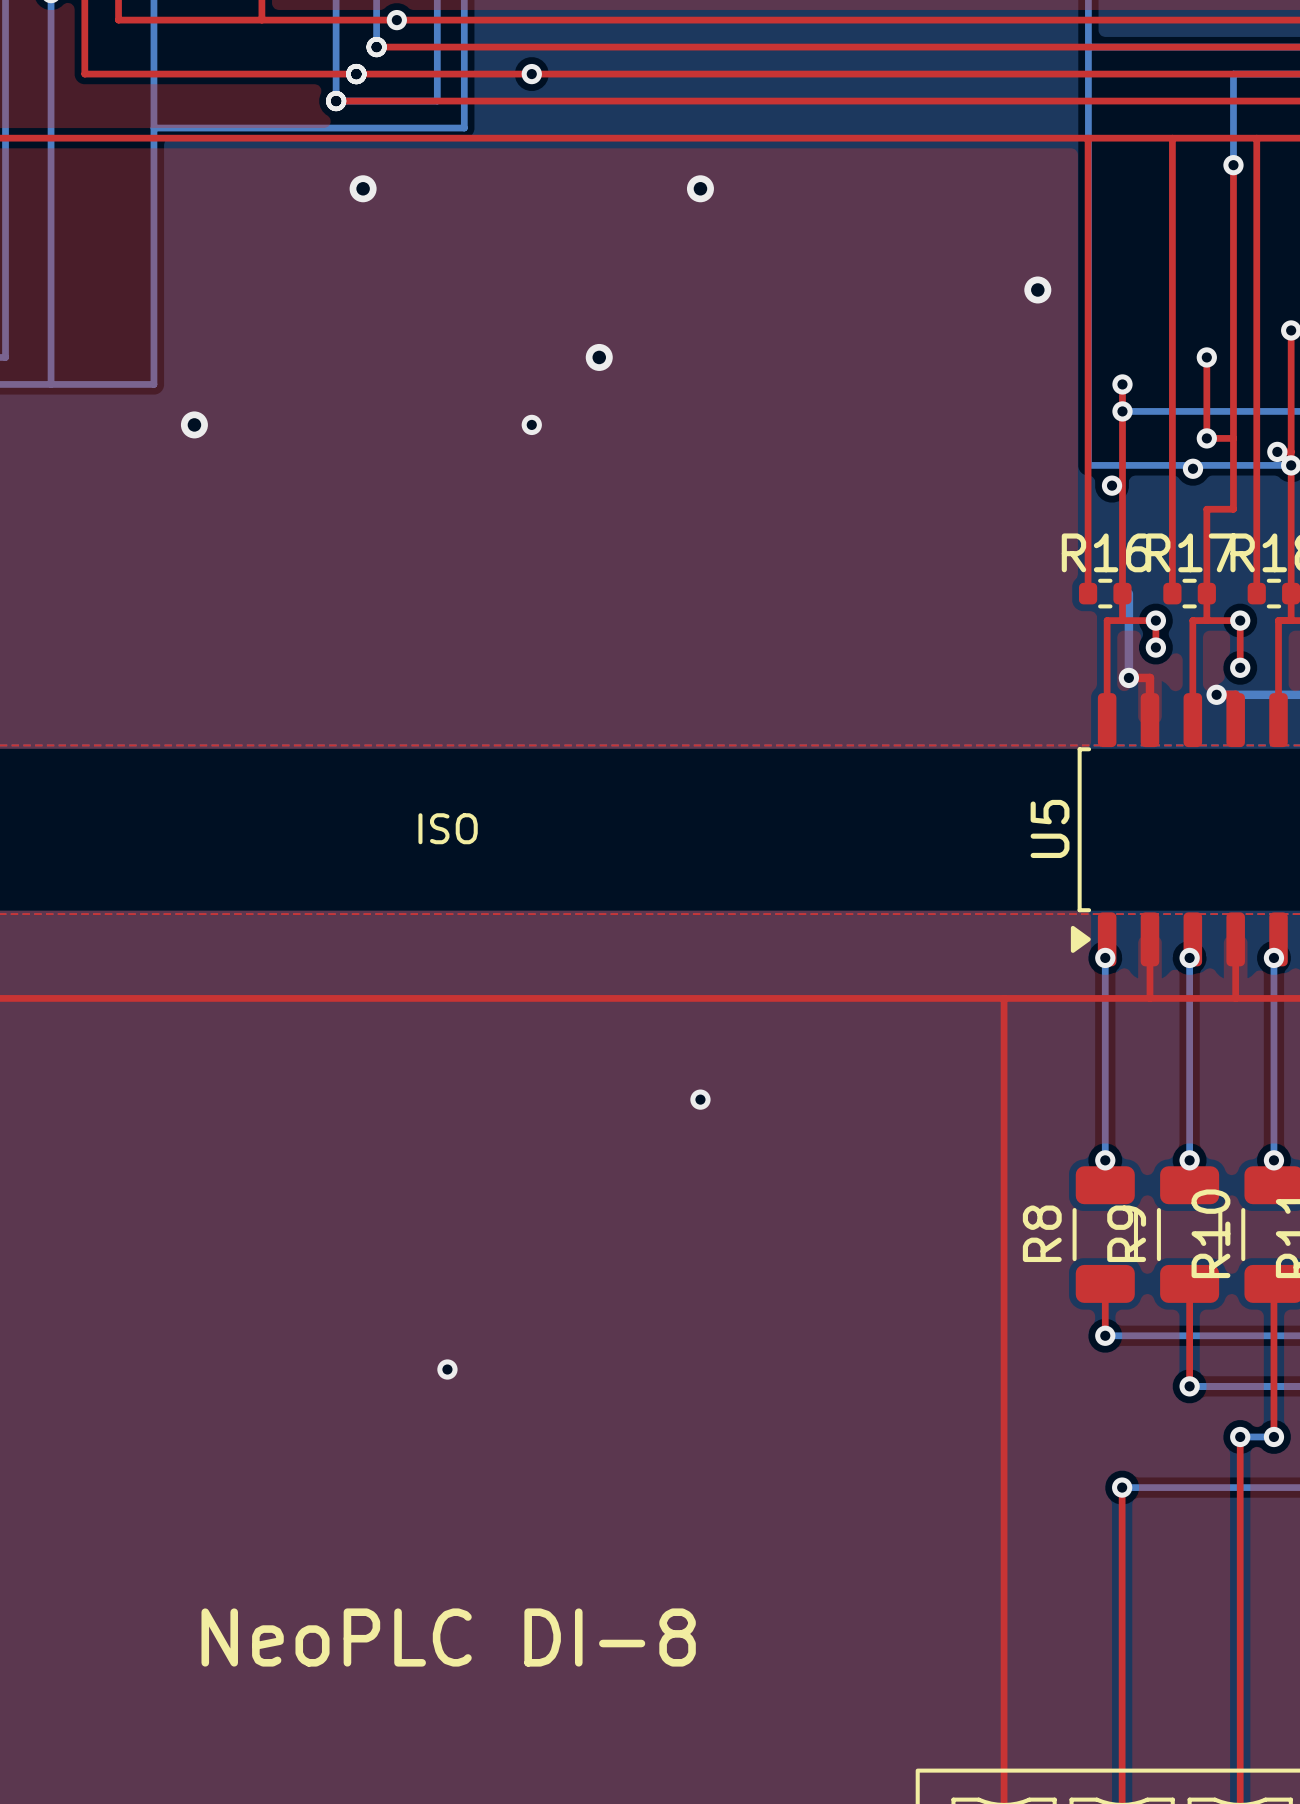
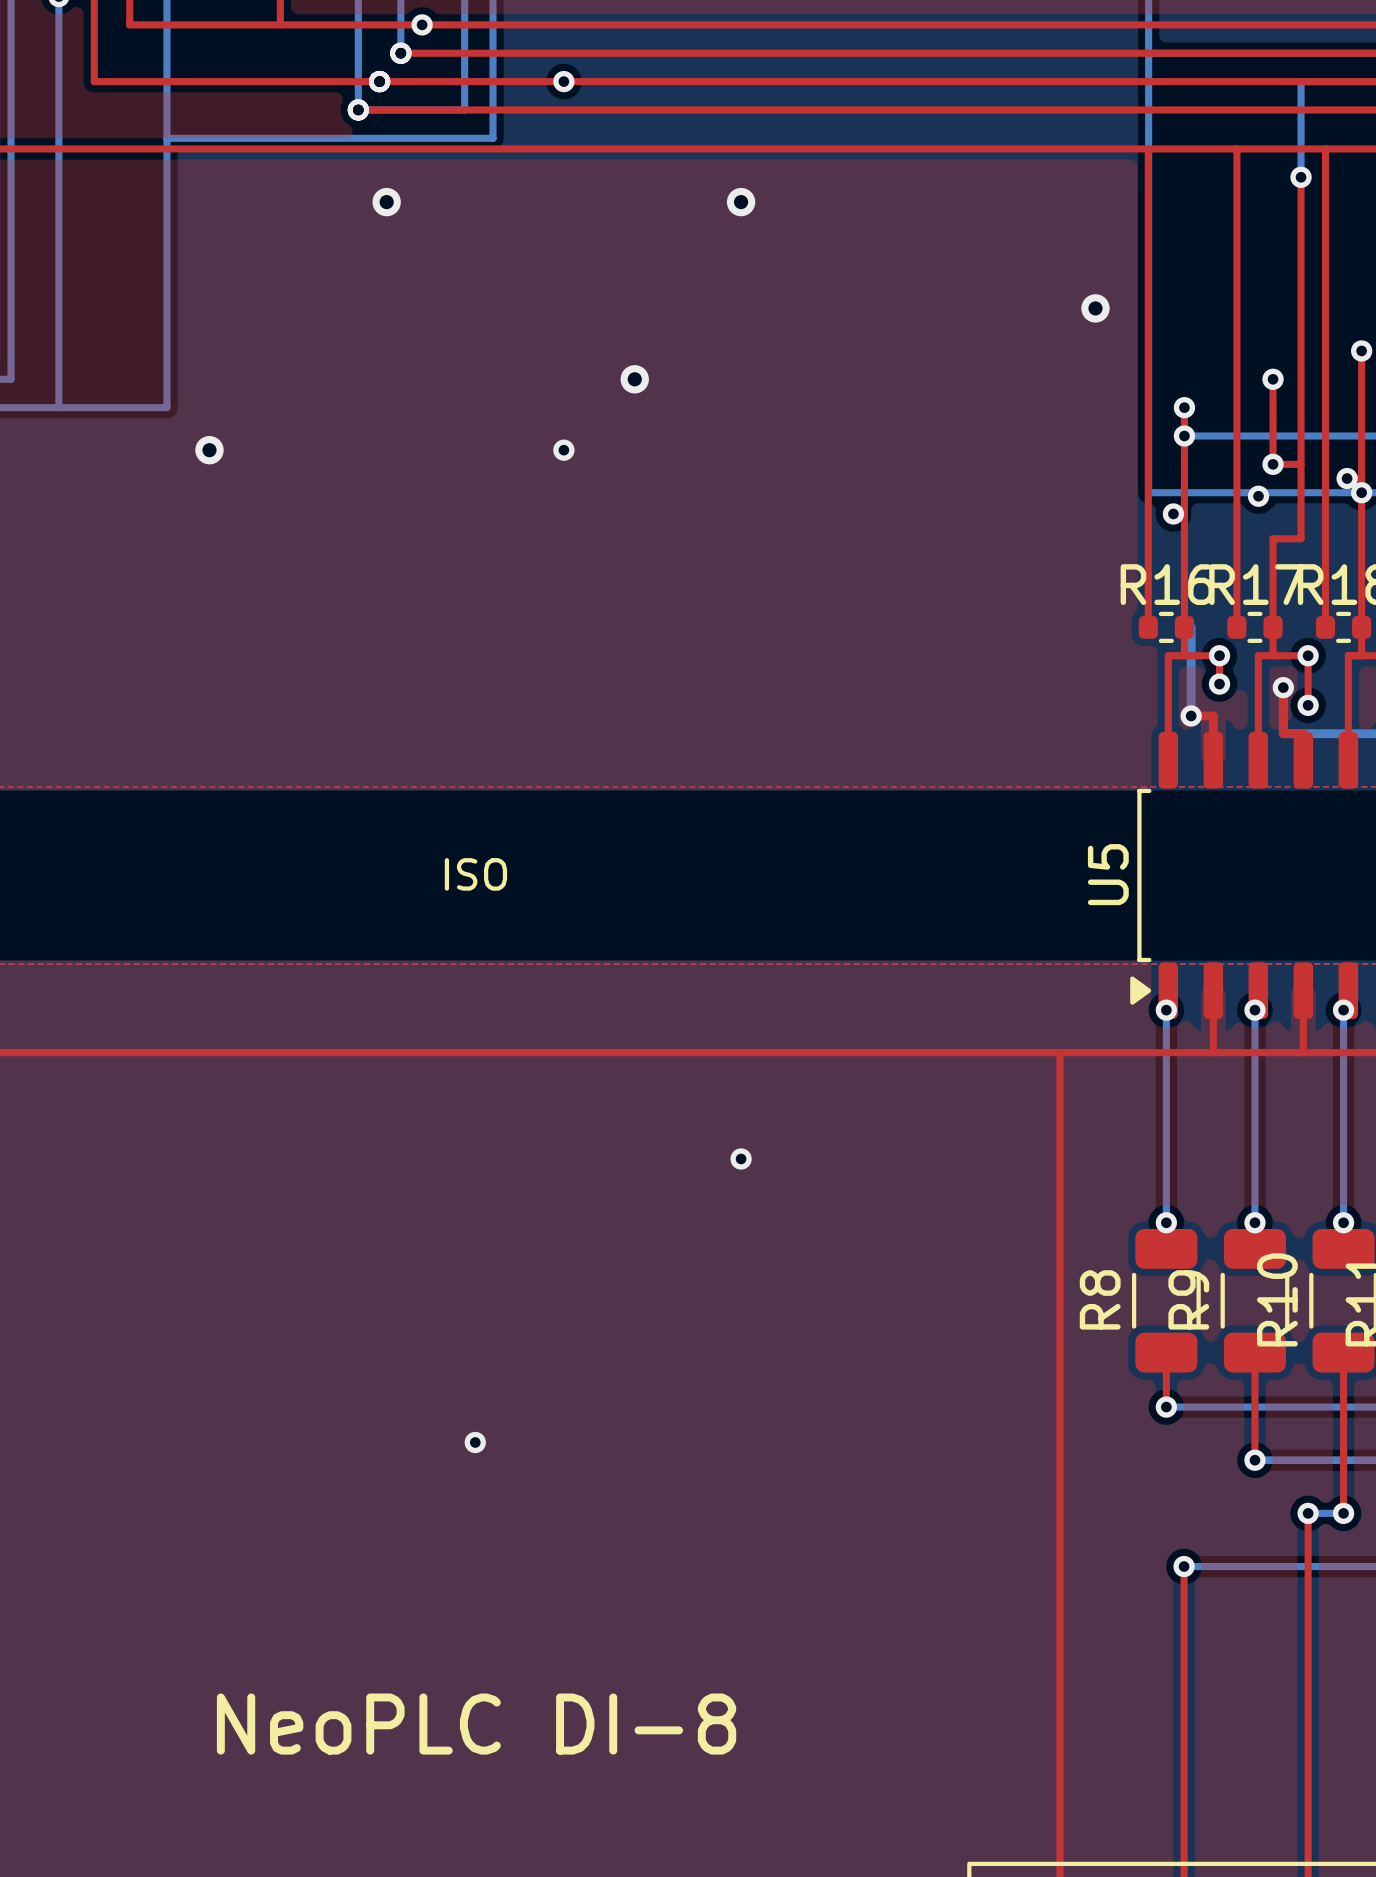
top track: none -> (1283, 687) (1283, 733)
via position: (1216, 694) -> (1283, 687)

